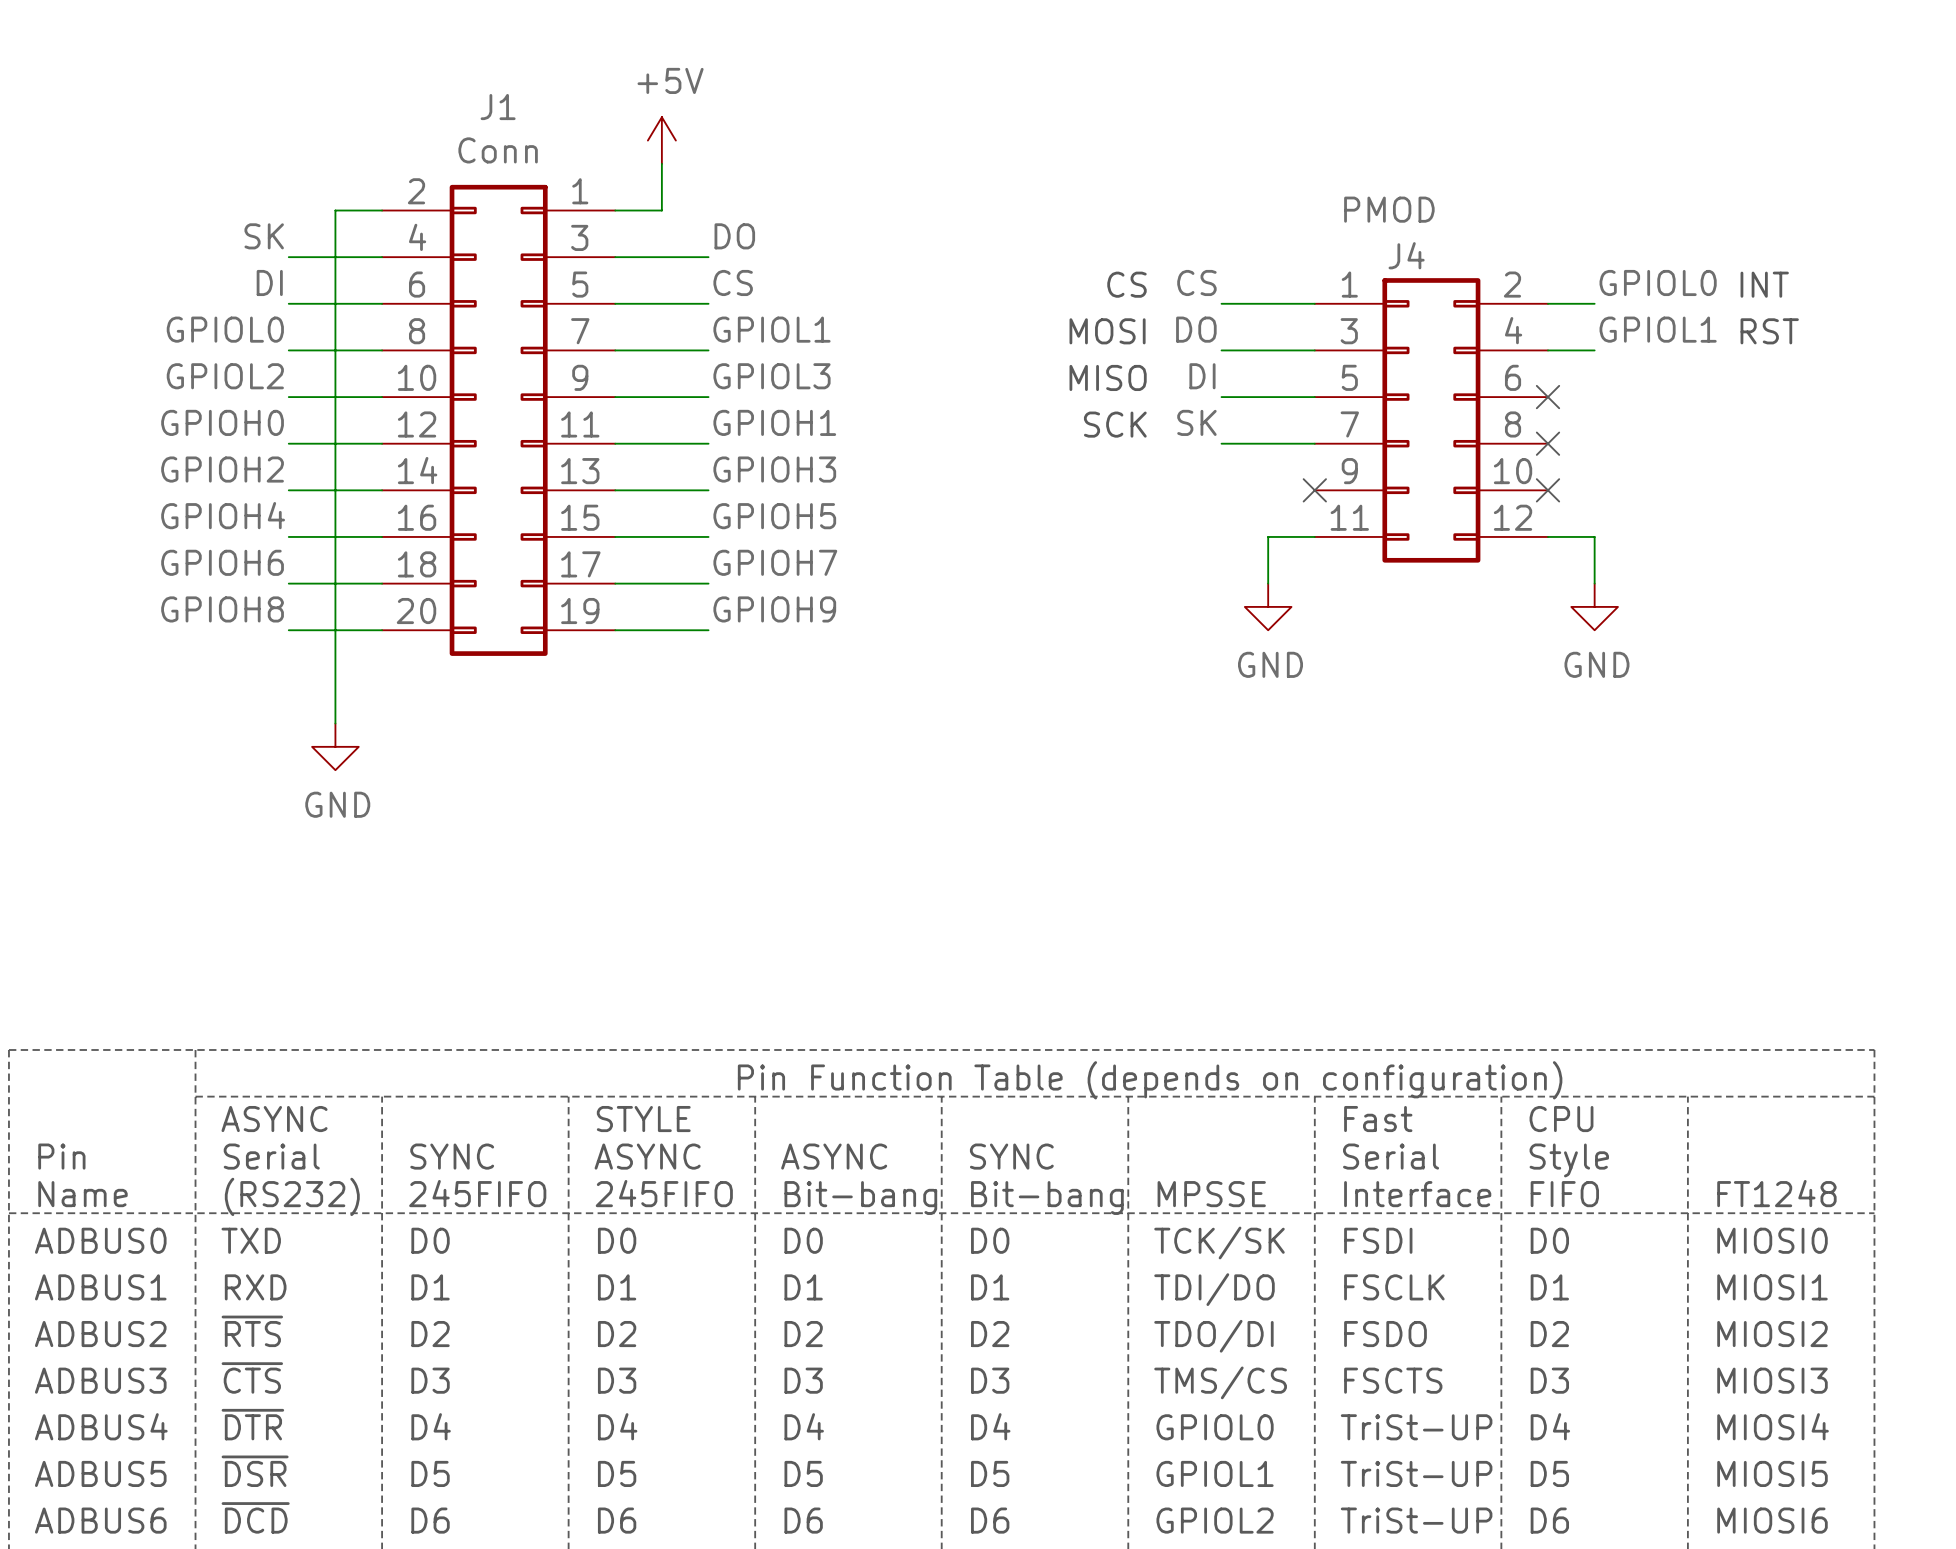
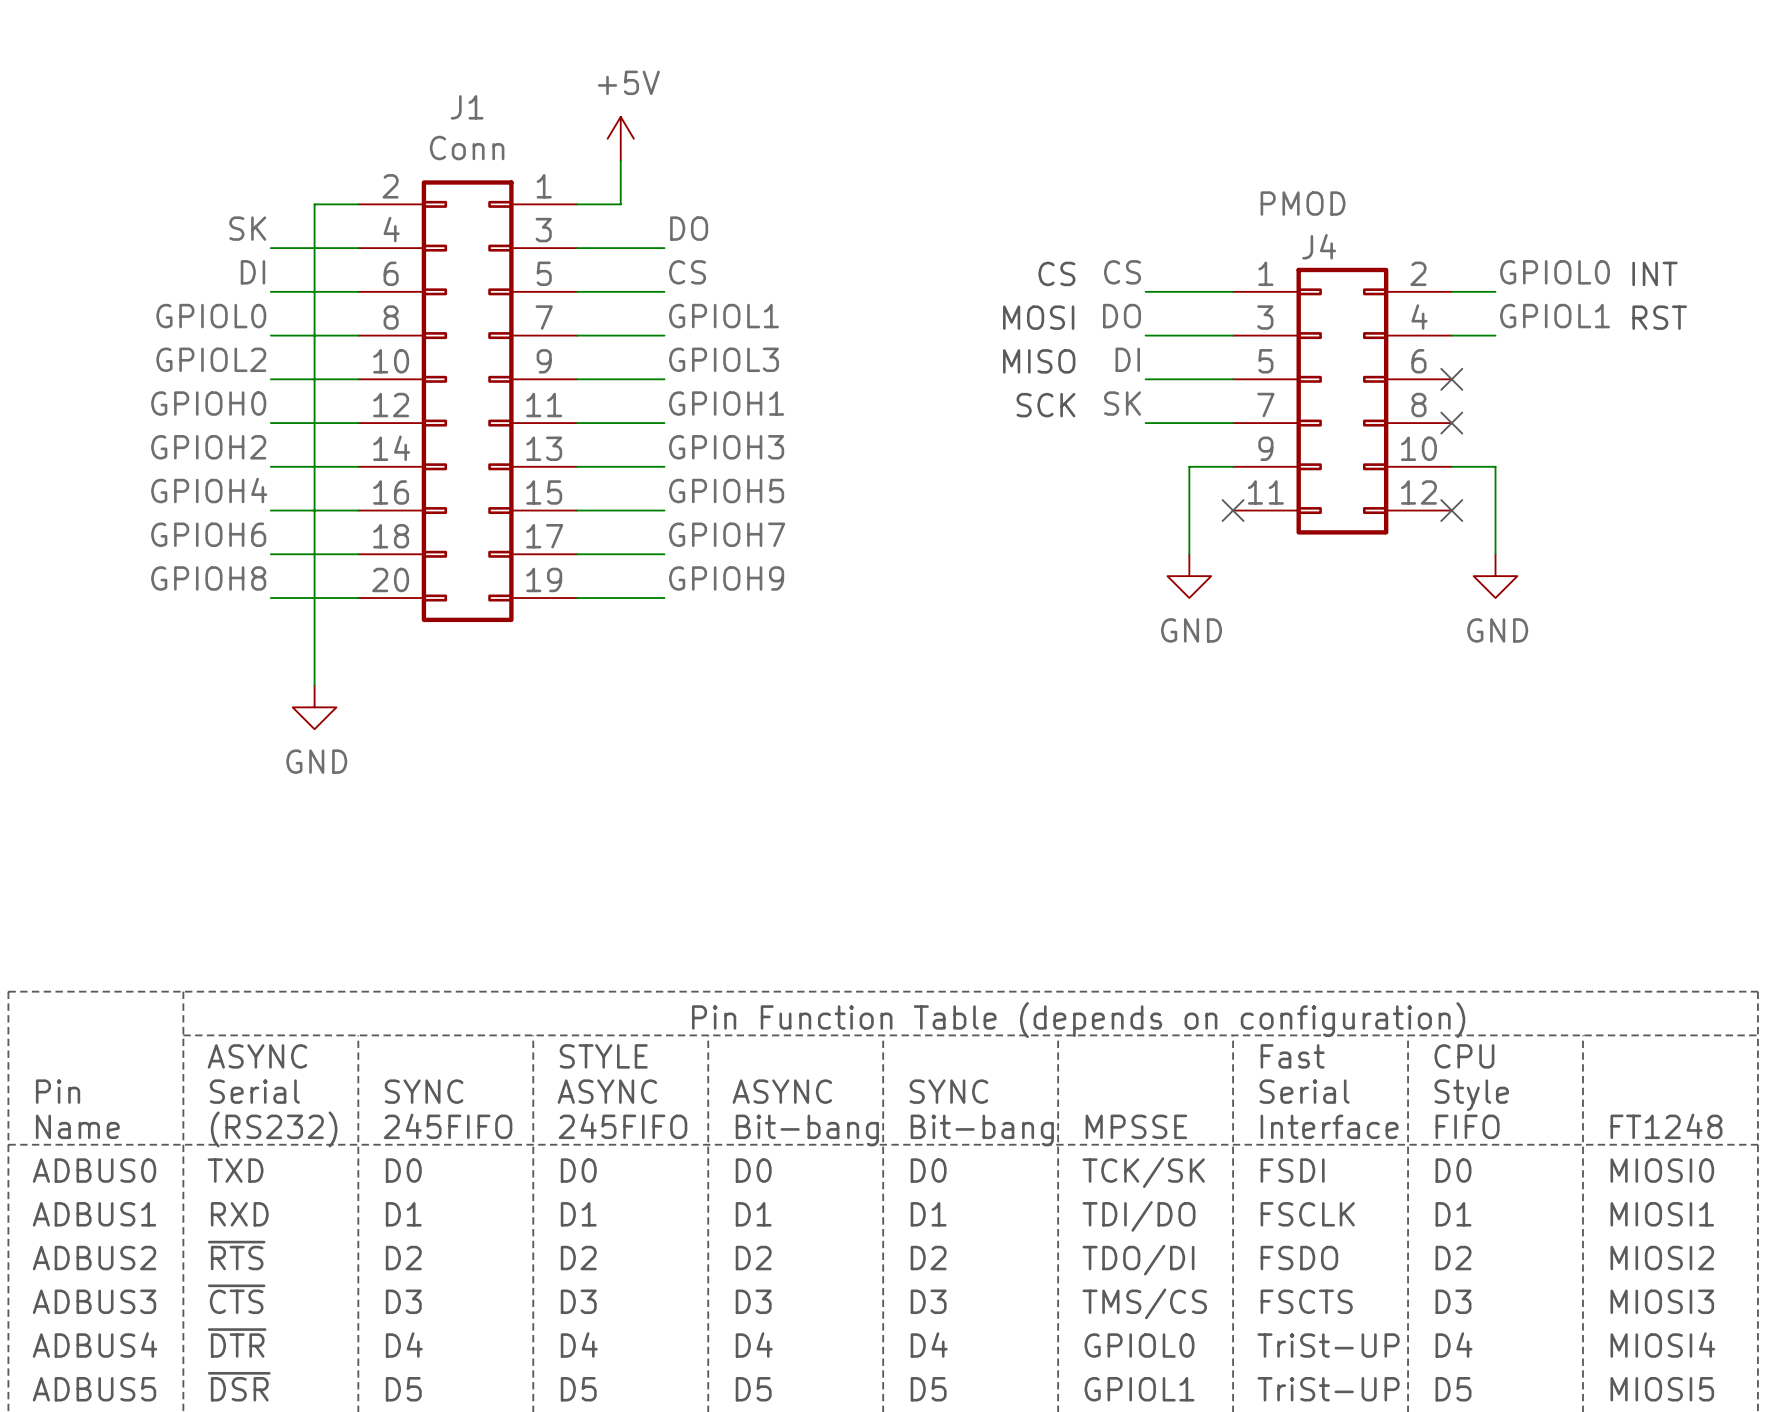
no-connect mark position: (1314, 490) -> (1233, 510)
no-connect mark position: (1548, 490) -> (1451, 510)
wire: (1268, 536) (1314, 536) -> (1189, 510) (1189, 466) (1233, 466)
wire: (1548, 536) (1594, 536) -> (1451, 466) (1495, 466) (1495, 510)

